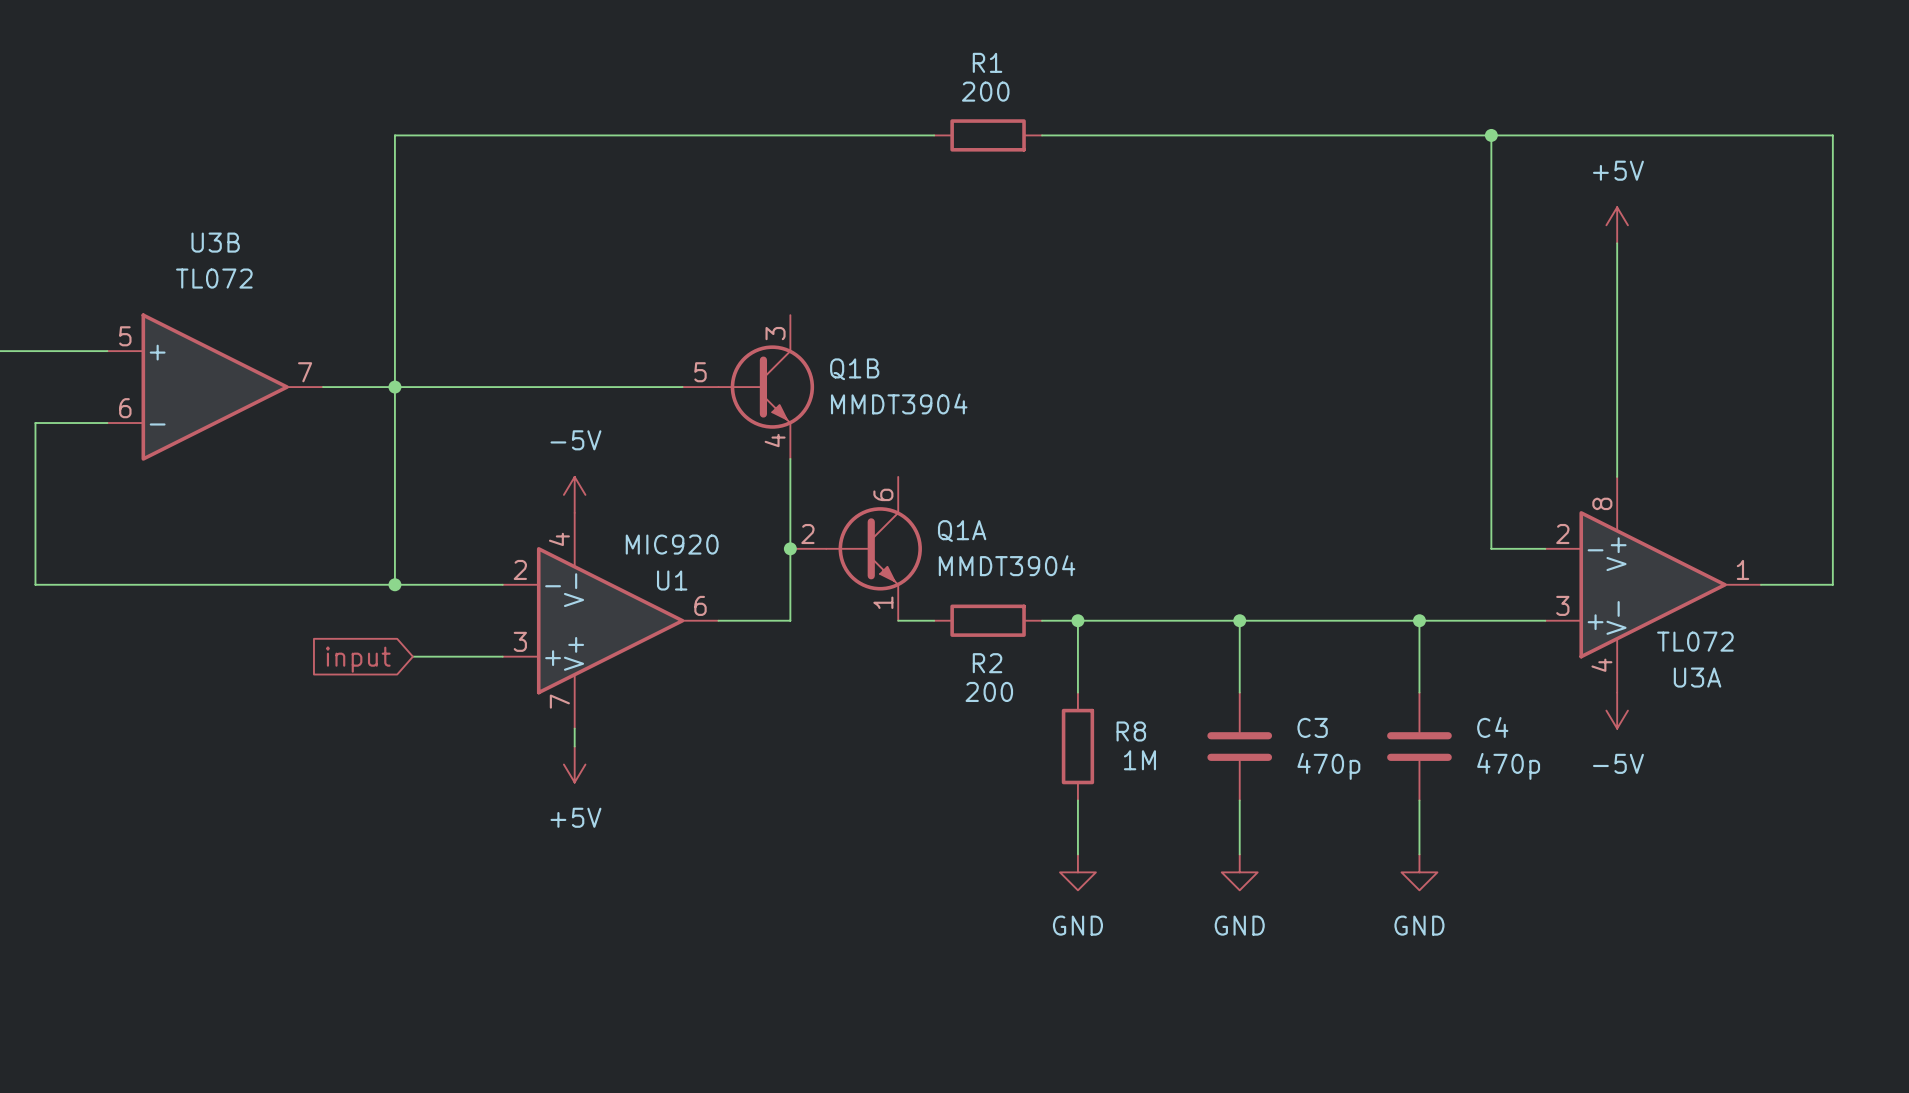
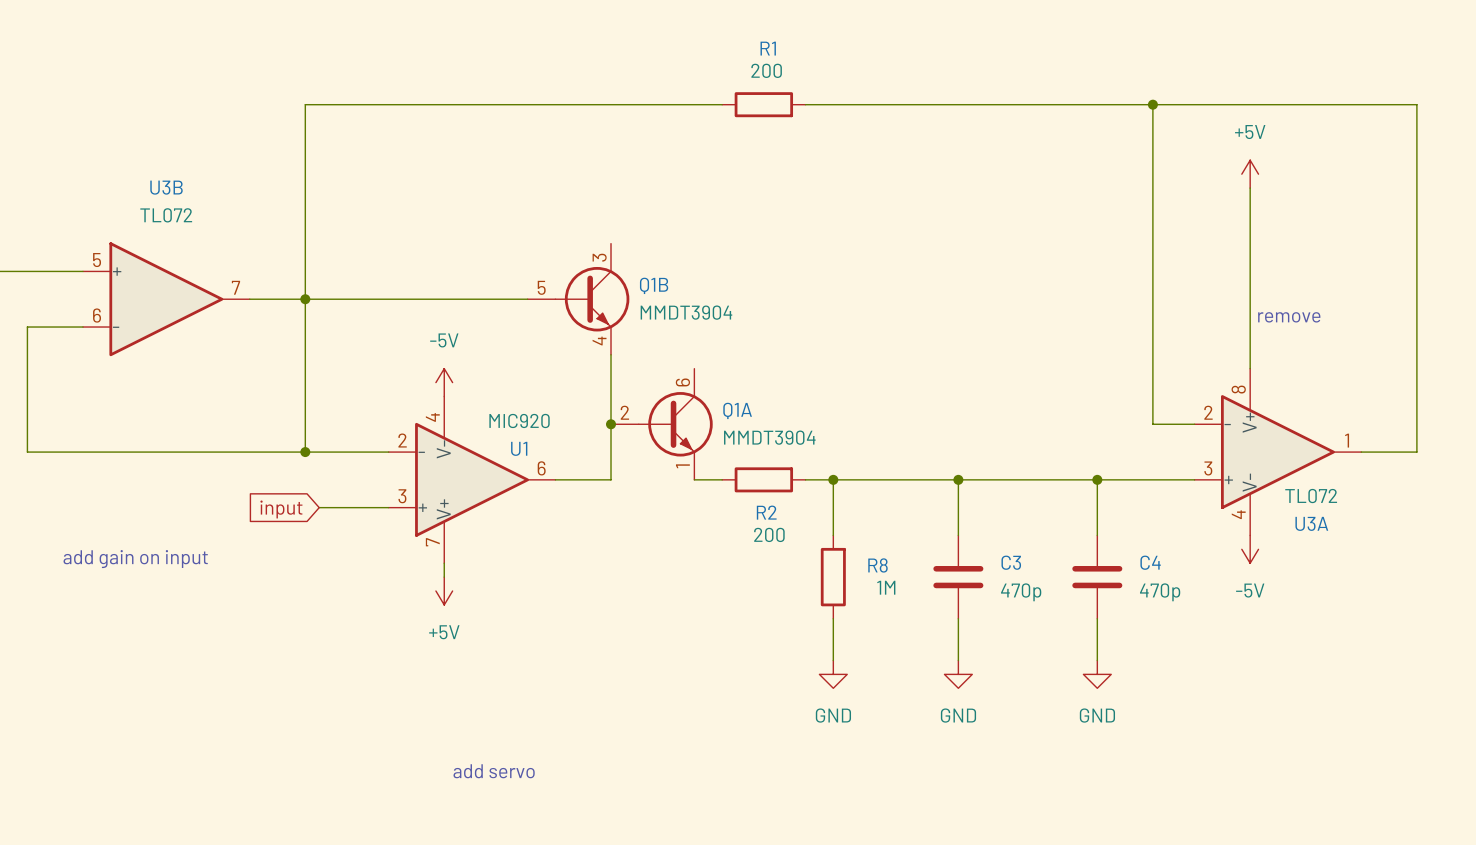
text: none -> remove (1289, 317)
text: none -> add gain on input (135, 559)
text: none -> add servo (494, 771)

